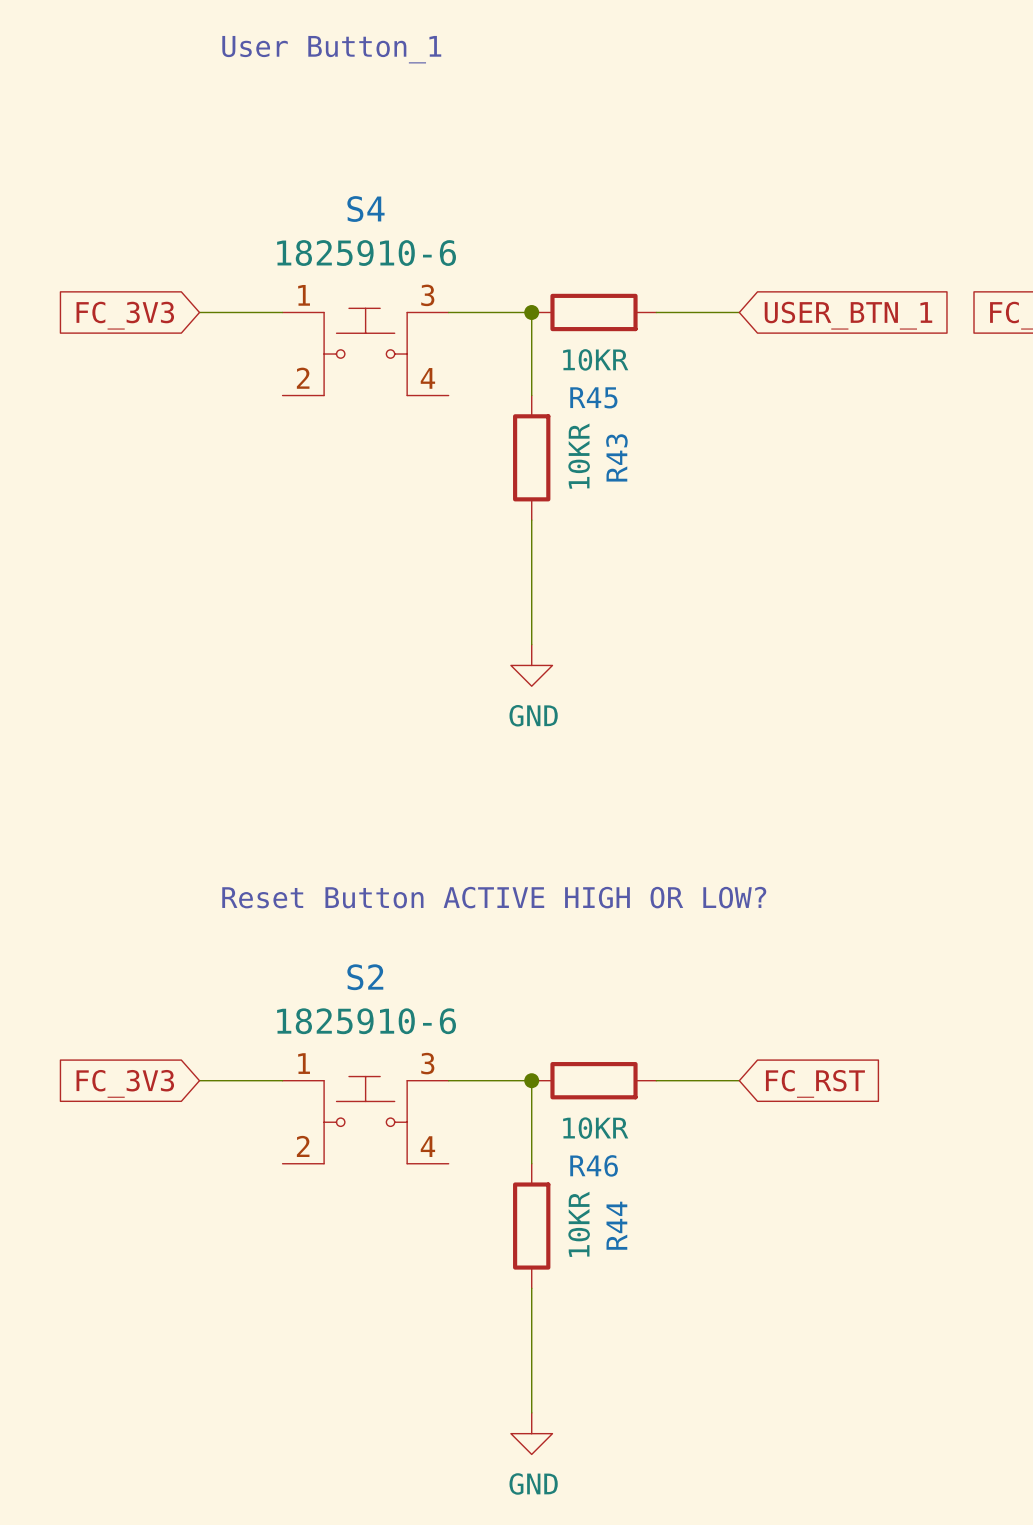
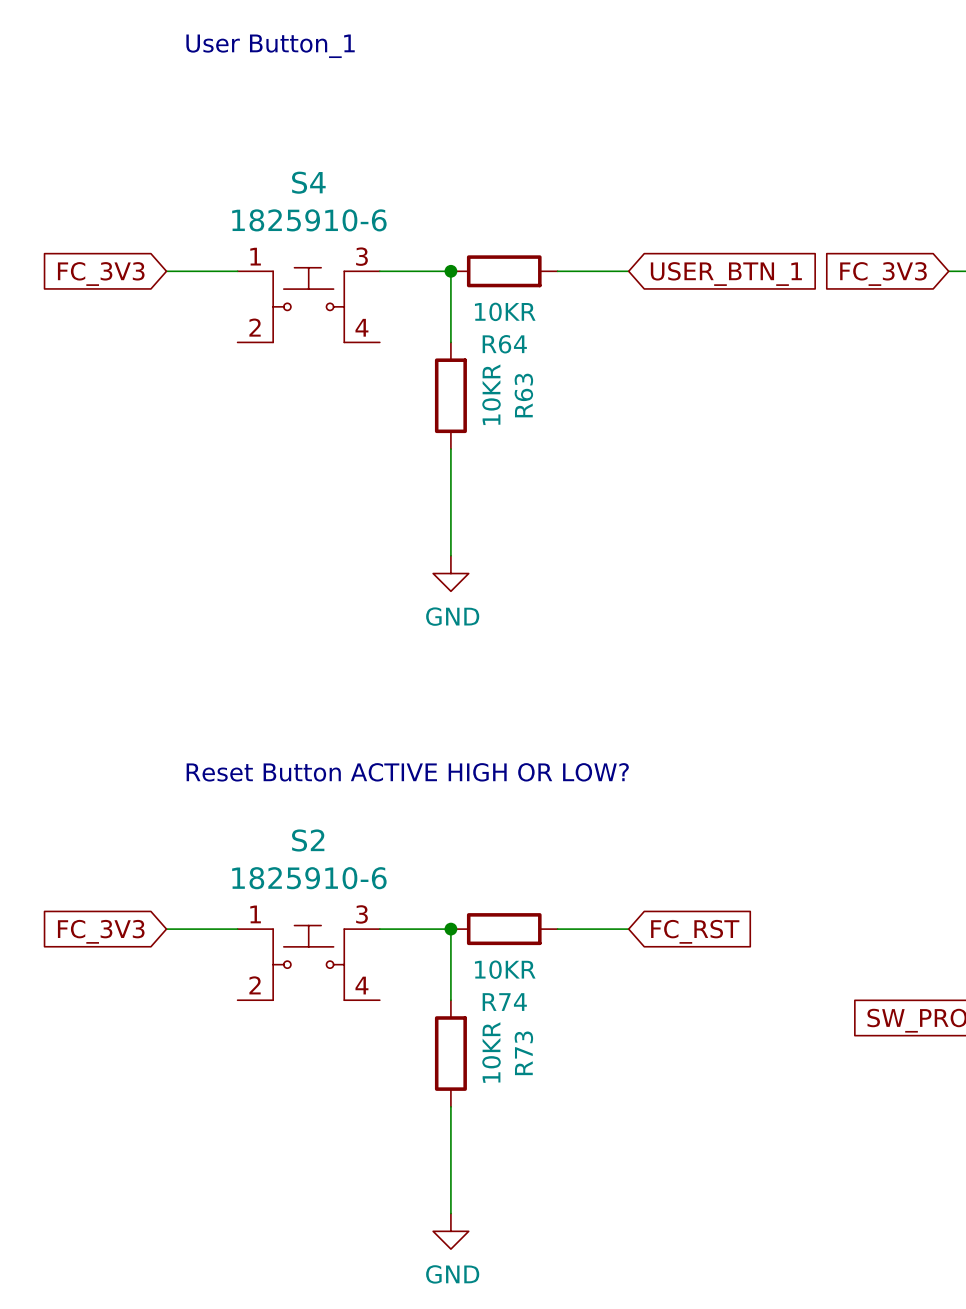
R45 name: R45 (593, 397) -> R64 (504, 344)
R43 name: R43 (616, 457) -> R63 (523, 395)
R46 name: R46 (594, 1165) -> R74 (504, 1002)
R44 name: R44 (616, 1225) -> R73 (523, 1053)

